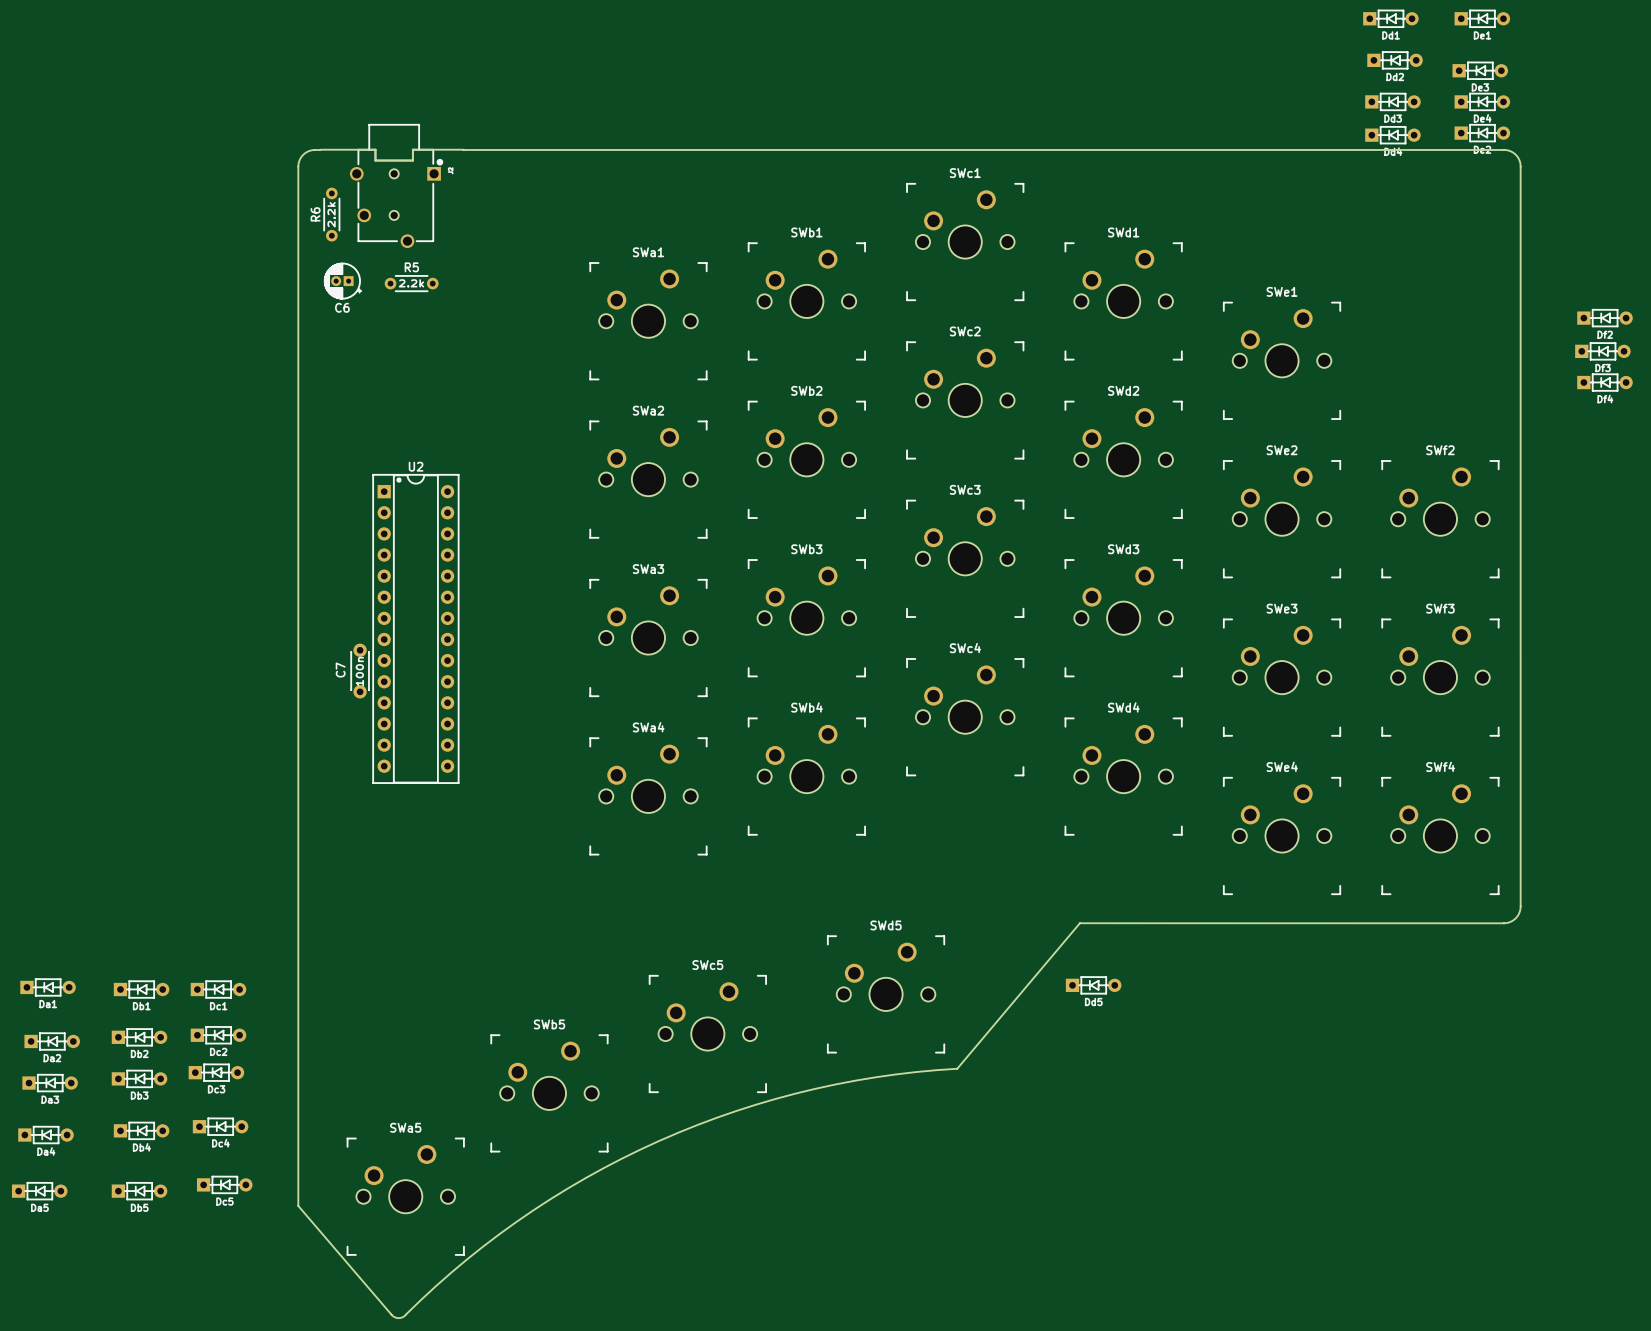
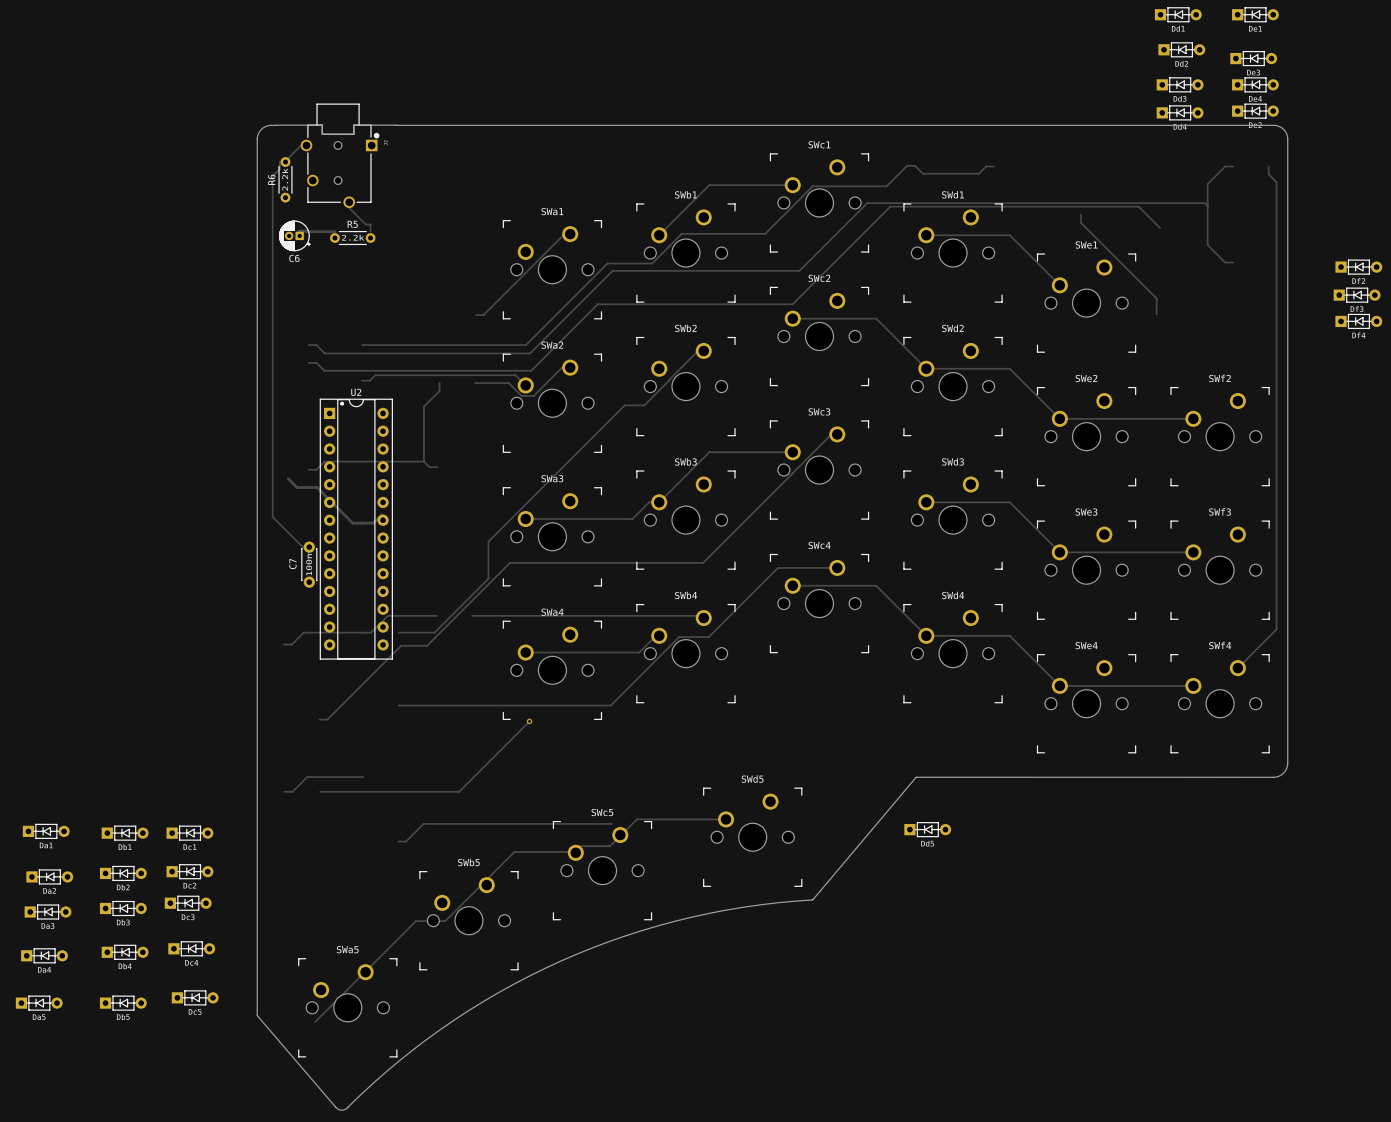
track: none -> (300, 145) (287, 161) (279, 161) (279, 168) (272, 176) (272, 516) (308, 550) (308, 558)
track: none -> (994, 166) (986, 166) (978, 173) (922, 173) (915, 165) (907, 165) (886, 186) (812, 186) (802, 196)
track: none -> (1233, 166) (1225, 166) (1207, 184) (1207, 245) (1225, 262) (1233, 262)
track: none -> (1268, 166) (1268, 174) (1276, 182) (1276, 629) (1237, 668)
track: none -> (792, 185) (709, 185) (659, 235)
track: none -> (802, 196) (765, 233) (681, 233) (652, 263) (607, 263) (525, 345) (362, 345)
track: none -> (343, 202) (365, 224) (370, 224) (370, 231)
track: none -> (1207, 205) (1204, 203) (867, 203) (799, 270) (612, 270) (530, 353) (324, 353) (316, 345) (308, 345)
track: none -> (1080, 214) (1080, 222) (1156, 298) (1156, 314)
track: none -> (1160, 228) (1138, 206) (890, 206) (792, 304) (597, 304) (531, 370) (324, 370) (316, 362) (308, 362)
track: none -> (298, 230) (334, 231)
track: none -> (570, 234) (564, 234) (525, 273)
track: none -> (926, 235) (1009, 235) (1059, 285)
track: none -> (525, 273) (483, 315) (475, 315)
track: none -> (792, 318) (876, 318) (926, 368) (1009, 368) (1059, 418) (1193, 418)
track: none -> (703, 350) (698, 350) (644, 405) (624, 405) (488, 541) (488, 578) (434, 632) (398, 632)
track: none -> (570, 367) (562, 367) (533, 395) (521, 395) (508, 383) (475, 383)
track: none -> (362, 380) (369, 380) (375, 375) (515, 375) (525, 385)
track: none -> (439, 383) (439, 390) (423, 406) (423, 461)
track: none -> (837, 434) (831, 434) (703, 562) (509, 562) (427, 645) (401, 645) (327, 719) (319, 719)
track: none -> (792, 452) (709, 452) (659, 502) (649, 502) (632, 518) (525, 518)
track: none -> (423, 461) (429, 467) (437, 467)
track: none -> (423, 461) (324, 461) (316, 469) (308, 469)
track: none -> (288, 478) (297, 487) (317, 487) (352, 523) (373, 523) (381, 514)
track: none -> (926, 502) (1009, 502) (1059, 552) (1193, 552)
track: none -> (837, 567) (777, 567) (708, 637) (679, 637) (669, 646)
track: none -> (792, 585) (876, 585) (926, 635) (1009, 635) (1059, 685) (1193, 685)
track: none -> (436, 615) (387, 615) (371, 632) (303, 632) (291, 644) (283, 644)
track: none -> (472, 615) (701, 615) (703, 618)
track: none -> (659, 635) (656, 635) (639, 652) (525, 652)
track: none -> (669, 646) (610, 705) (398, 705)
track: none -> (529, 721) (459, 791) (320, 791)
via: none -> (529, 721)
track: none -> (363, 777) (307, 777) (292, 791) (284, 791)
track: none -> (726, 819) (636, 819) (610, 846) (578, 846) (573, 851) (514, 851) (445, 921) (415, 921) (315, 1021)
track: none -> (611, 823) (423, 823) (405, 841) (398, 841)

